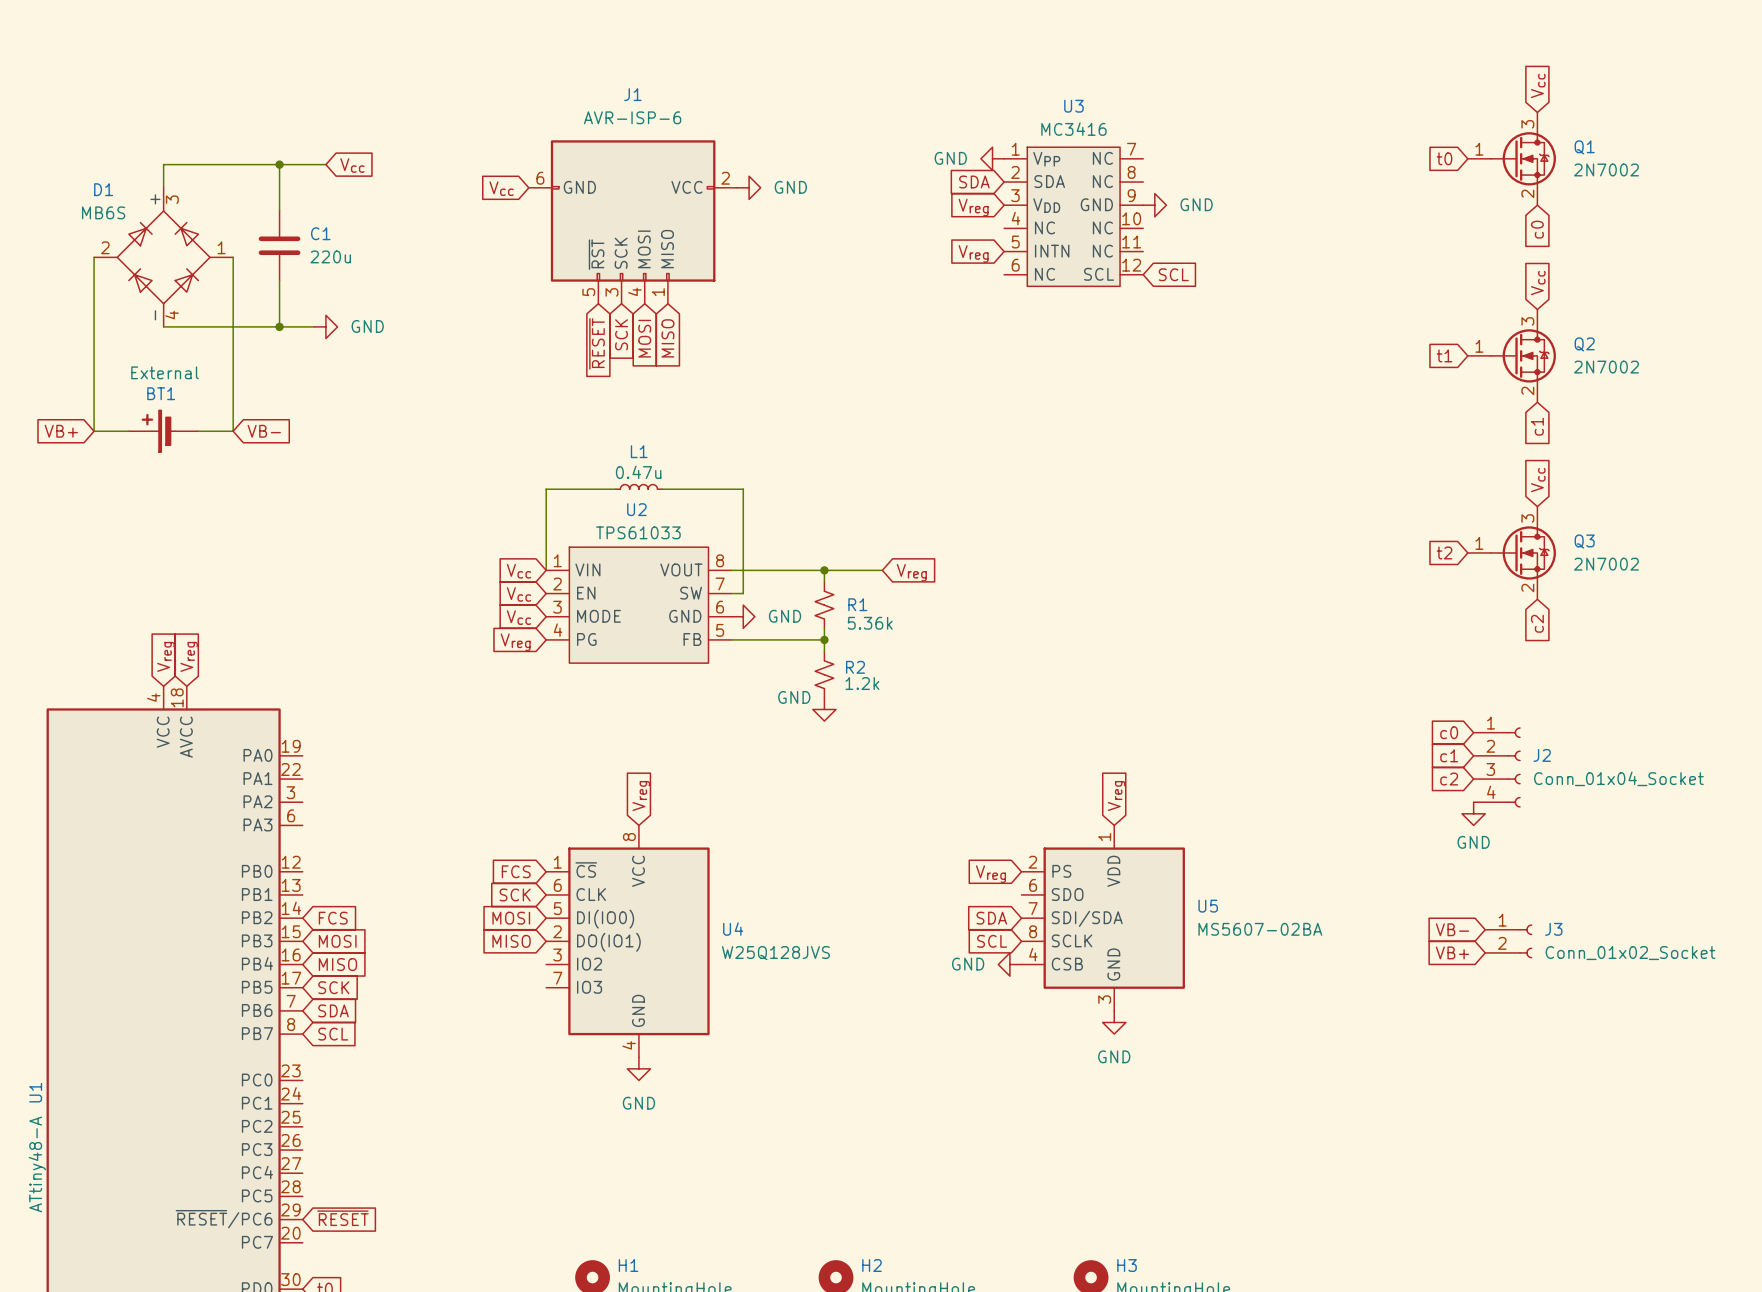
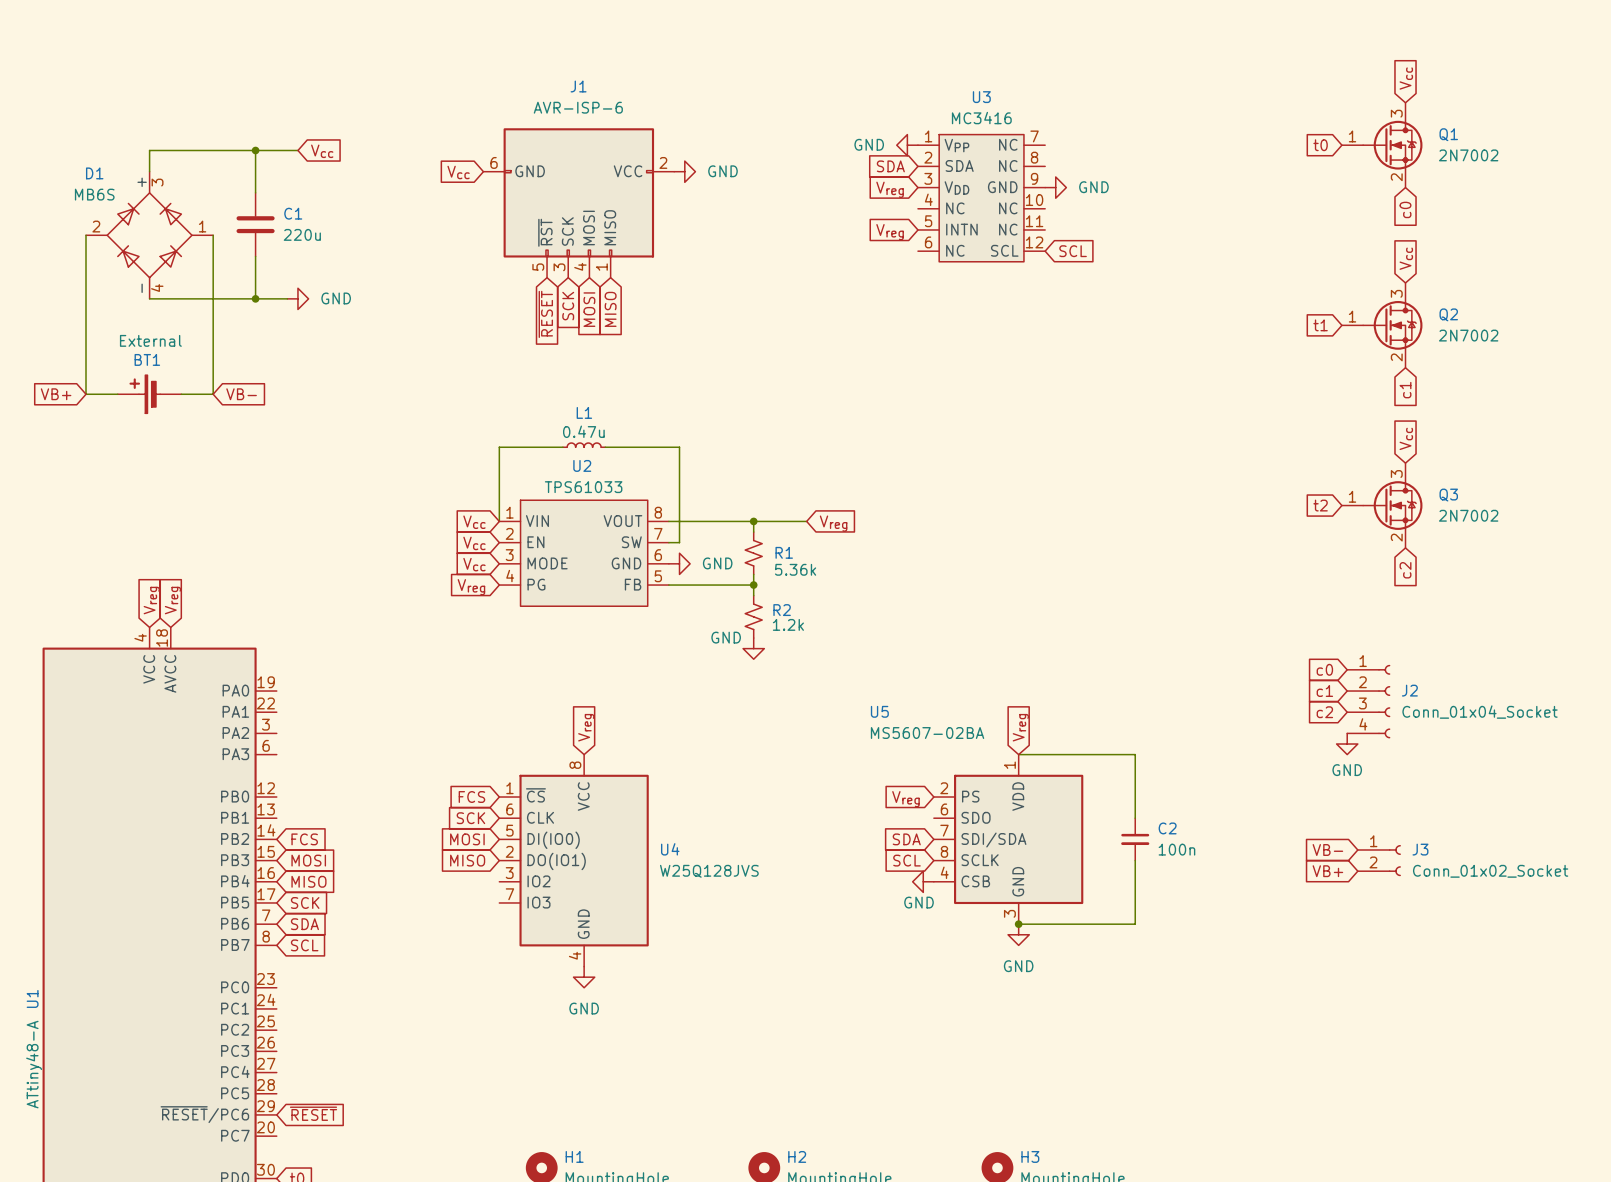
wire: none -> (1018, 754) (1135, 754) (1135, 818)
U5 name position: U5 (1208, 906) -> U5 (879, 711)
C2: none -> 100n (1135, 839)
U5 value position: MS5607-02BA (1260, 929) -> MS5607-02BA (927, 733)
wire: none -> (1135, 860) (1135, 924) (1018, 924)
power symbol text position: GND (968, 964) -> GND (919, 902)
junction: none -> (1018, 924)

